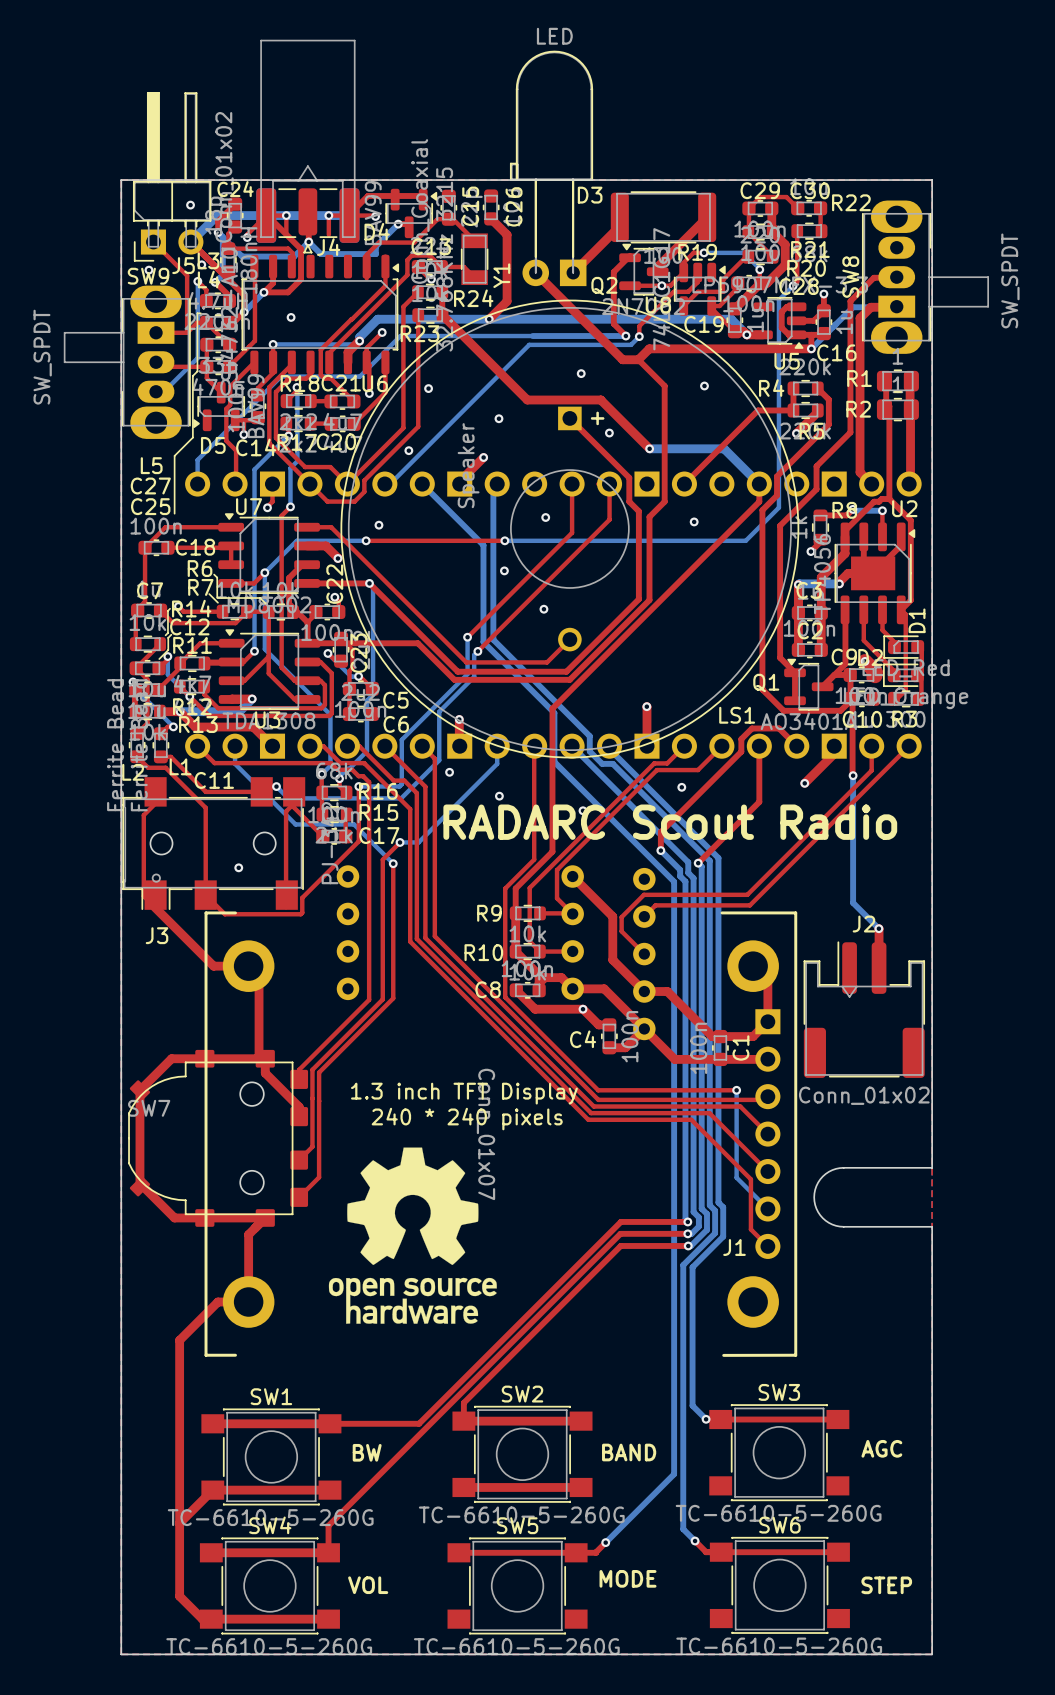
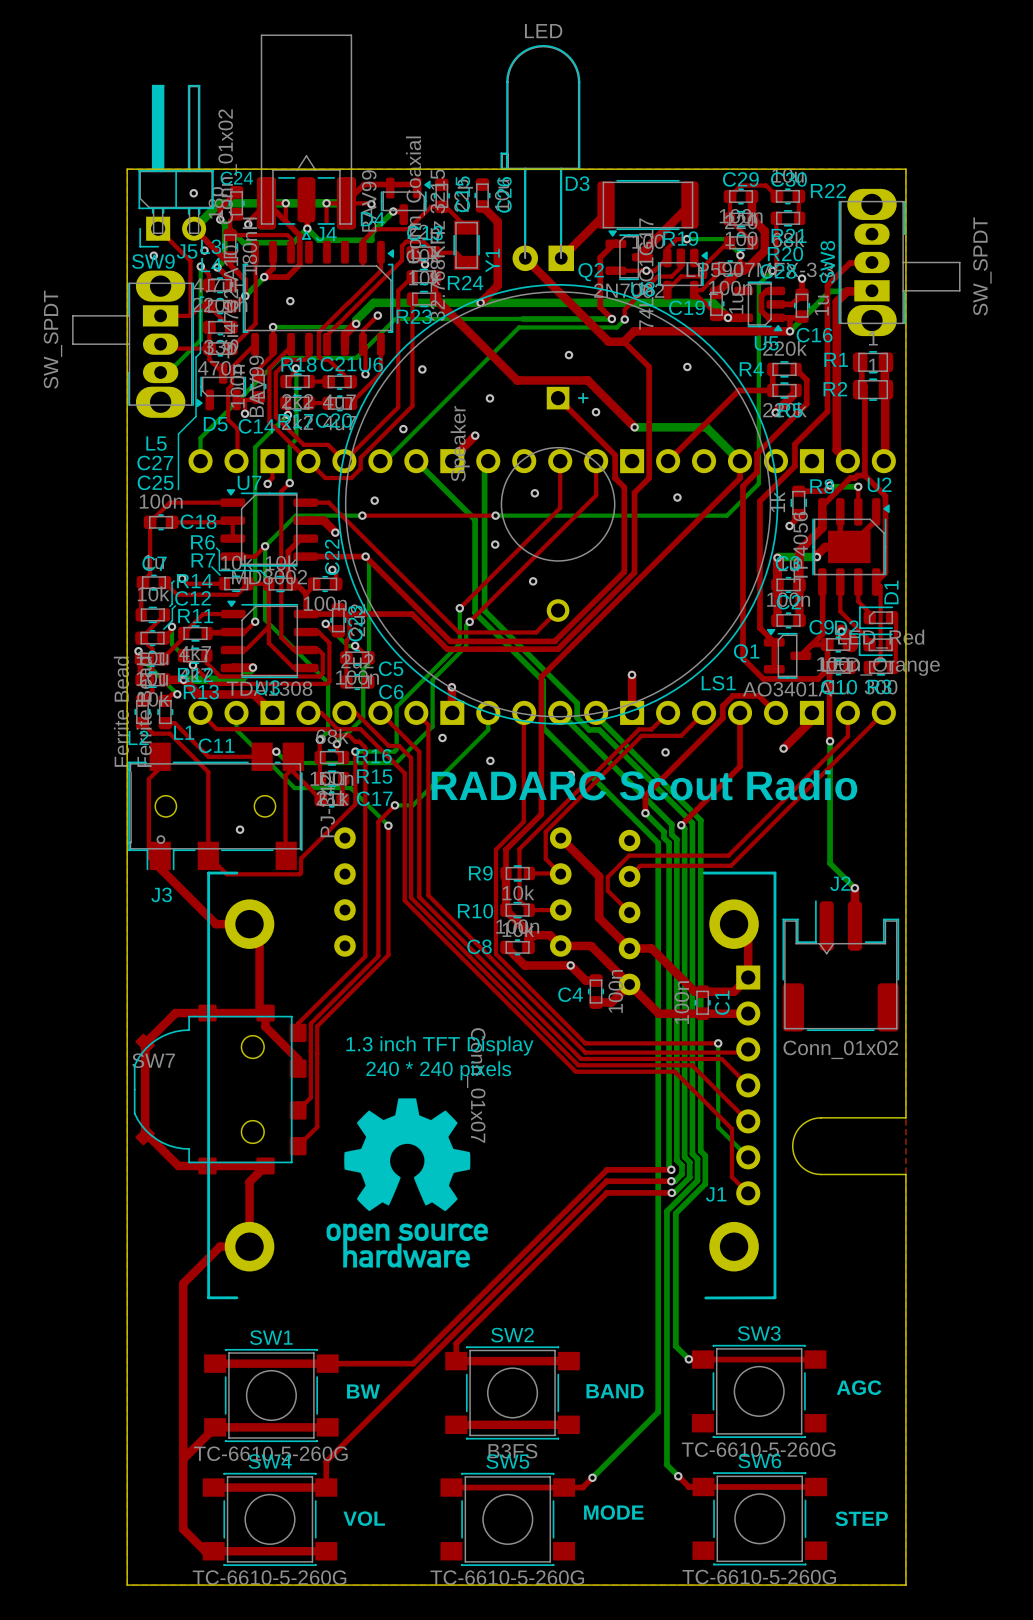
SW2 value: TC-6610-5-260G (521, 1514) -> B3FS (512, 1451)

